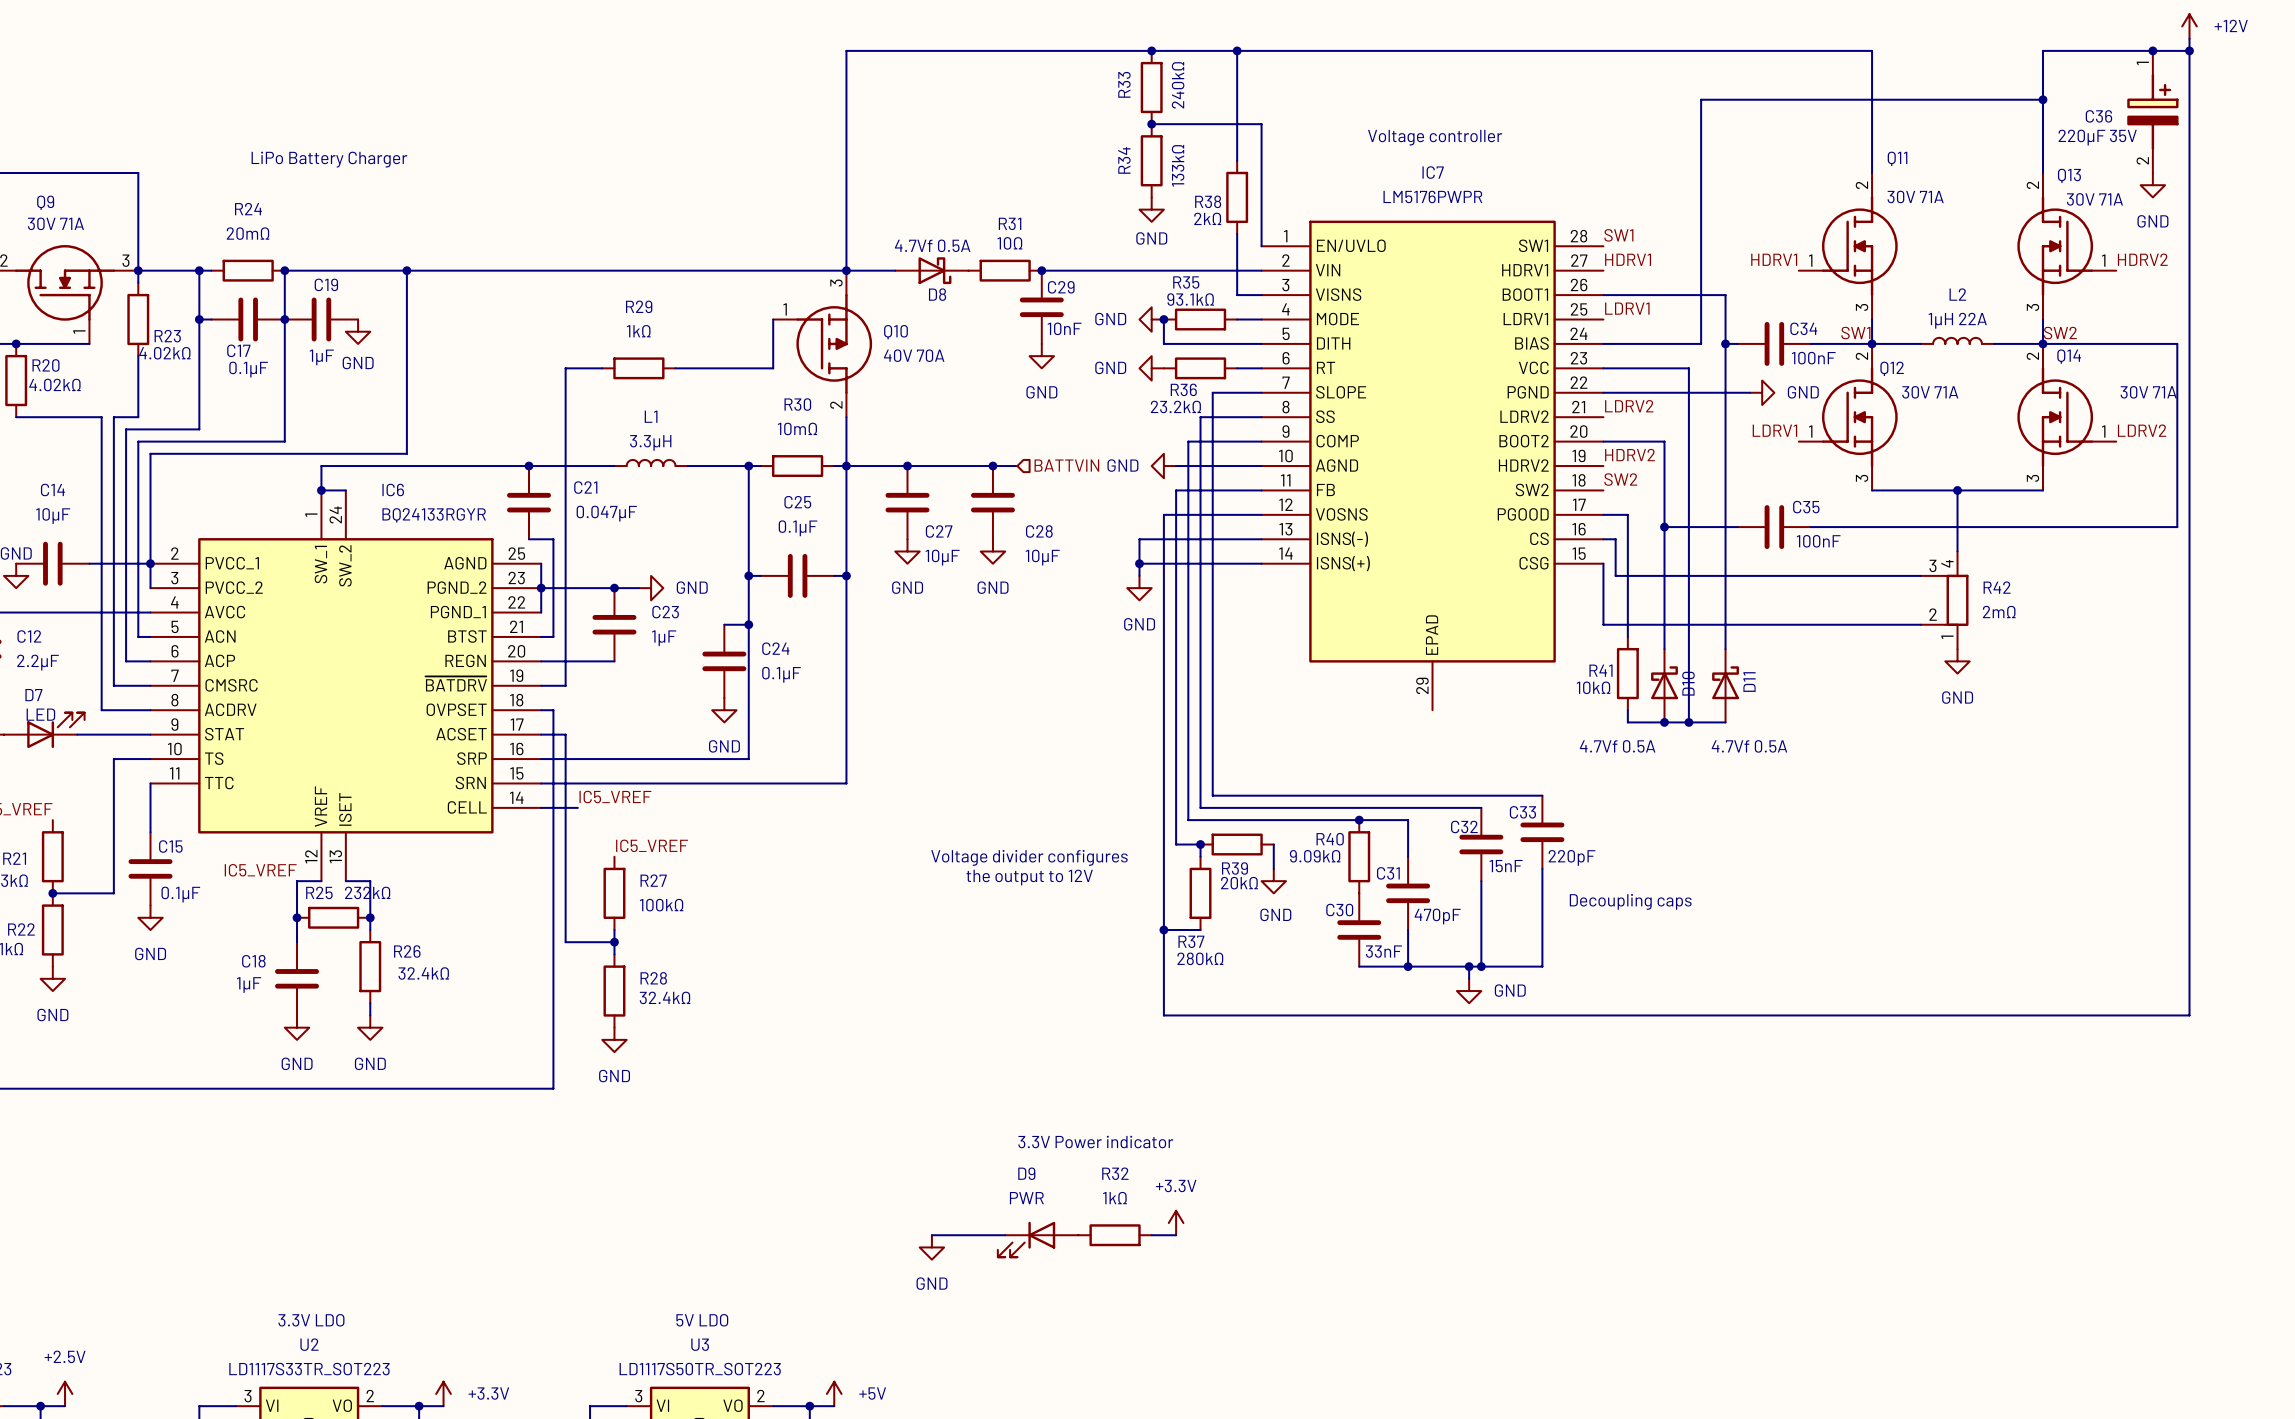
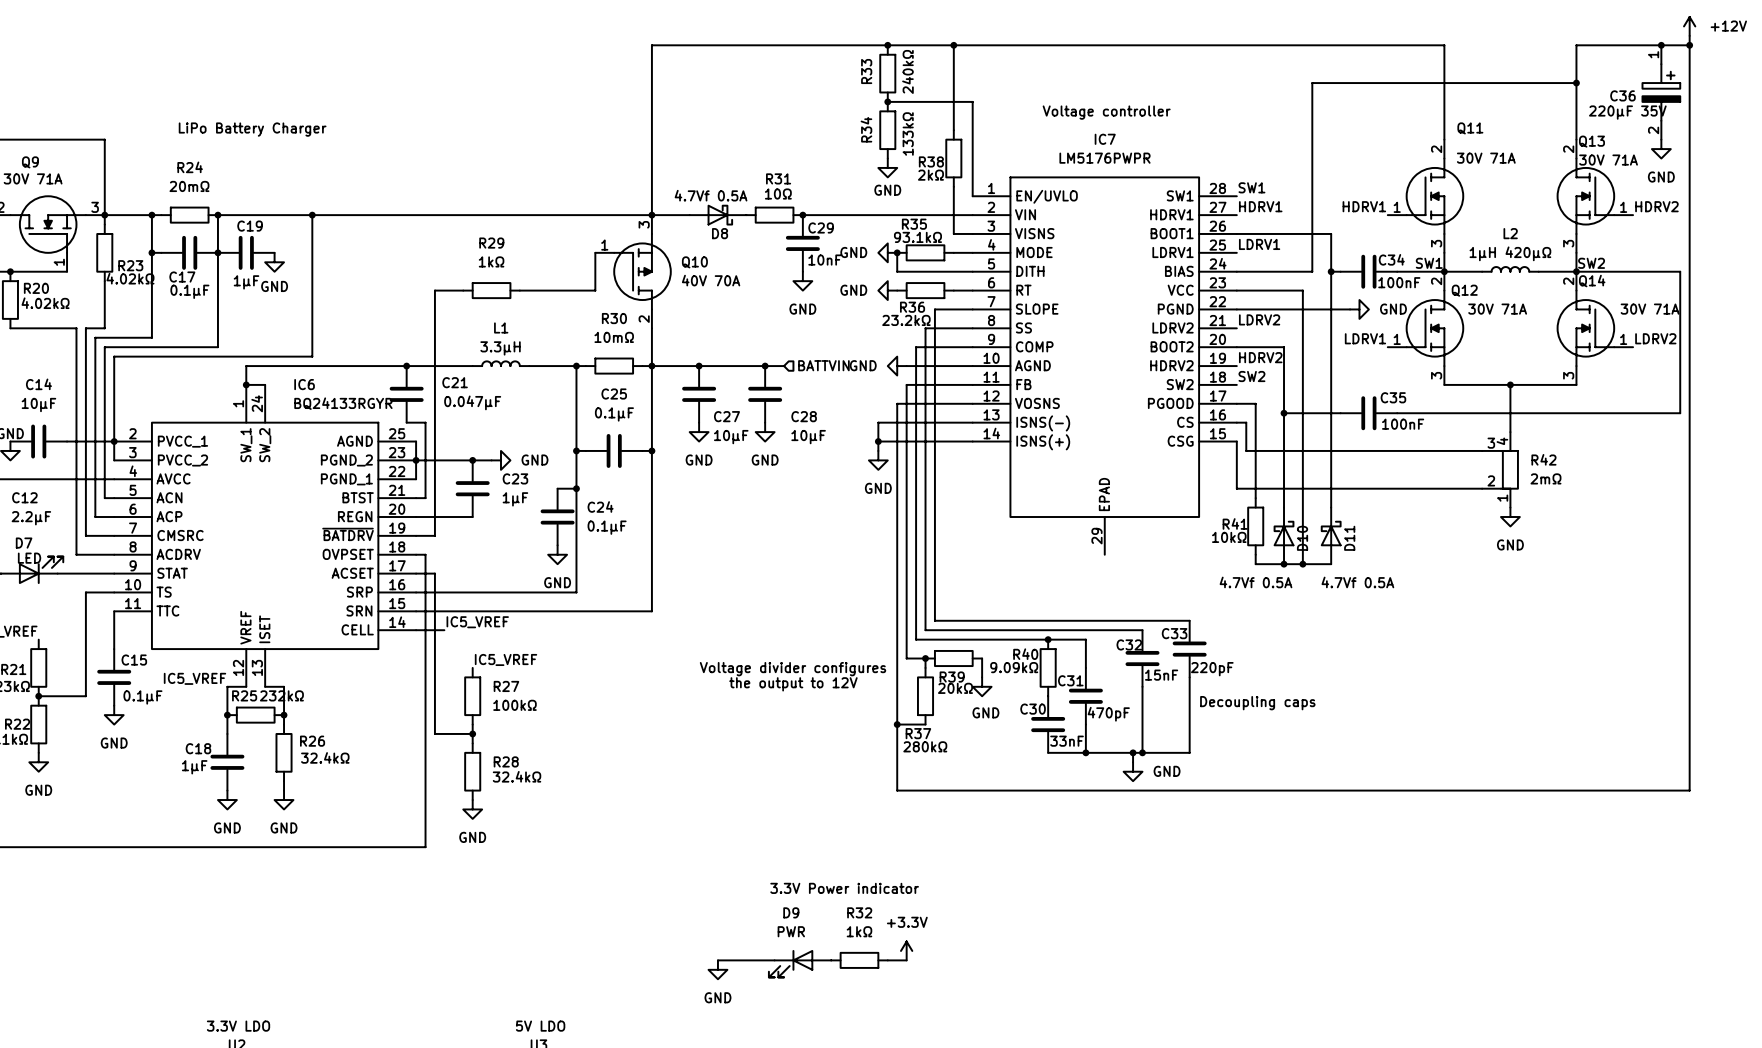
L2 value: 1µH 22A (1957, 320) -> 1µH 420µΩ (1510, 253)

